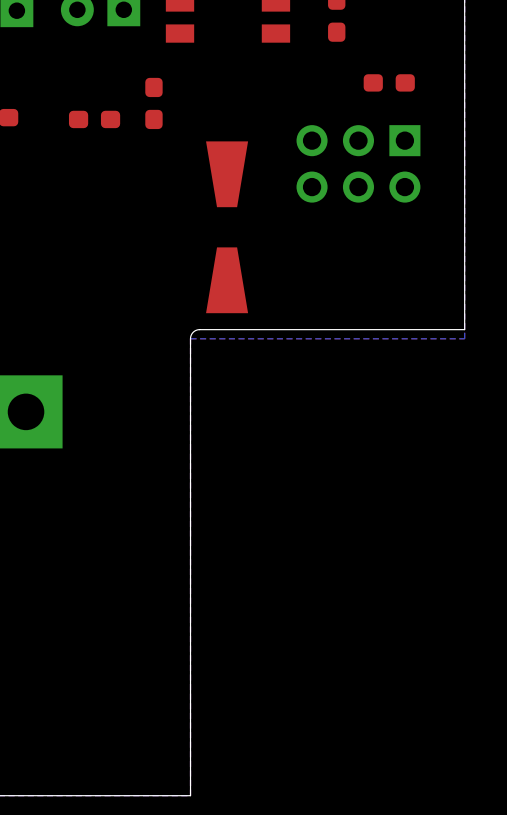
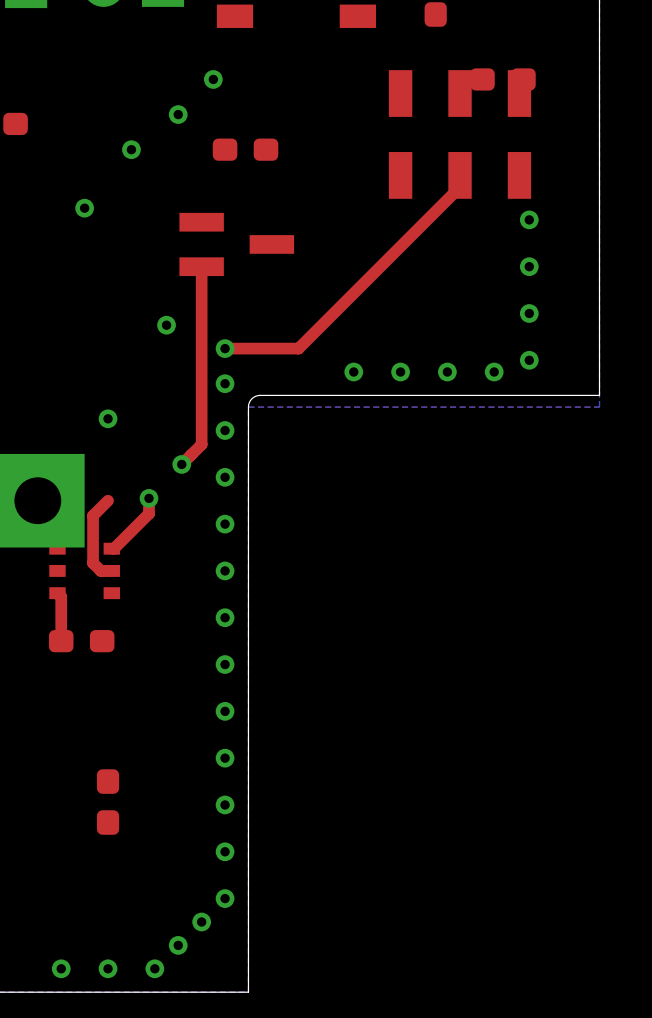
via: none -> (213, 79)
part: (153, 103) -> none
via: none -> (178, 114)
part: (94, 119) -> none
part: none -> (460, 134)
via: none -> (131, 149)
part: none -> (245, 149)
top track: none -> (460, 175) (460, 187) (298, 348) (225, 348)
part: (358, 163) -> none
via: none -> (84, 208)
via: none -> (529, 219)
part: none -> (236, 244)
part: (227, 227) -> none
top track: none -> (201, 266) (201, 444) (181, 464)
via: none -> (529, 266)
via: none -> (529, 313)
via: none -> (166, 325)
via: none -> (225, 348)
via: none -> (529, 360)
via: none -> (353, 372)
via: none -> (400, 372)
via: none -> (447, 372)
via: none -> (494, 372)
via: none -> (225, 383)
via: none -> (108, 418)
via: none -> (225, 430)
via: none -> (181, 464)
via: none -> (225, 477)
top track: none -> (148, 498) (148, 513) (114, 548) (111, 548)
via: none -> (148, 498)
top track: none -> (108, 500) (93, 515) (93, 563) (100, 570) (111, 570)
via: none -> (225, 524)
part: none -> (84, 570)
via: none -> (225, 570)
top track: none -> (57, 593) (61, 596) (61, 641)
via: none -> (225, 617)
part: none -> (81, 641)
via: none -> (225, 664)
via: none -> (225, 711)
via: none -> (225, 758)
part: none -> (108, 802)
via: none -> (225, 804)
via: none -> (225, 851)
via: none -> (225, 898)
via: none -> (201, 921)
via: none -> (178, 945)
via: none -> (61, 968)
via: none -> (108, 968)
via: none -> (154, 968)

